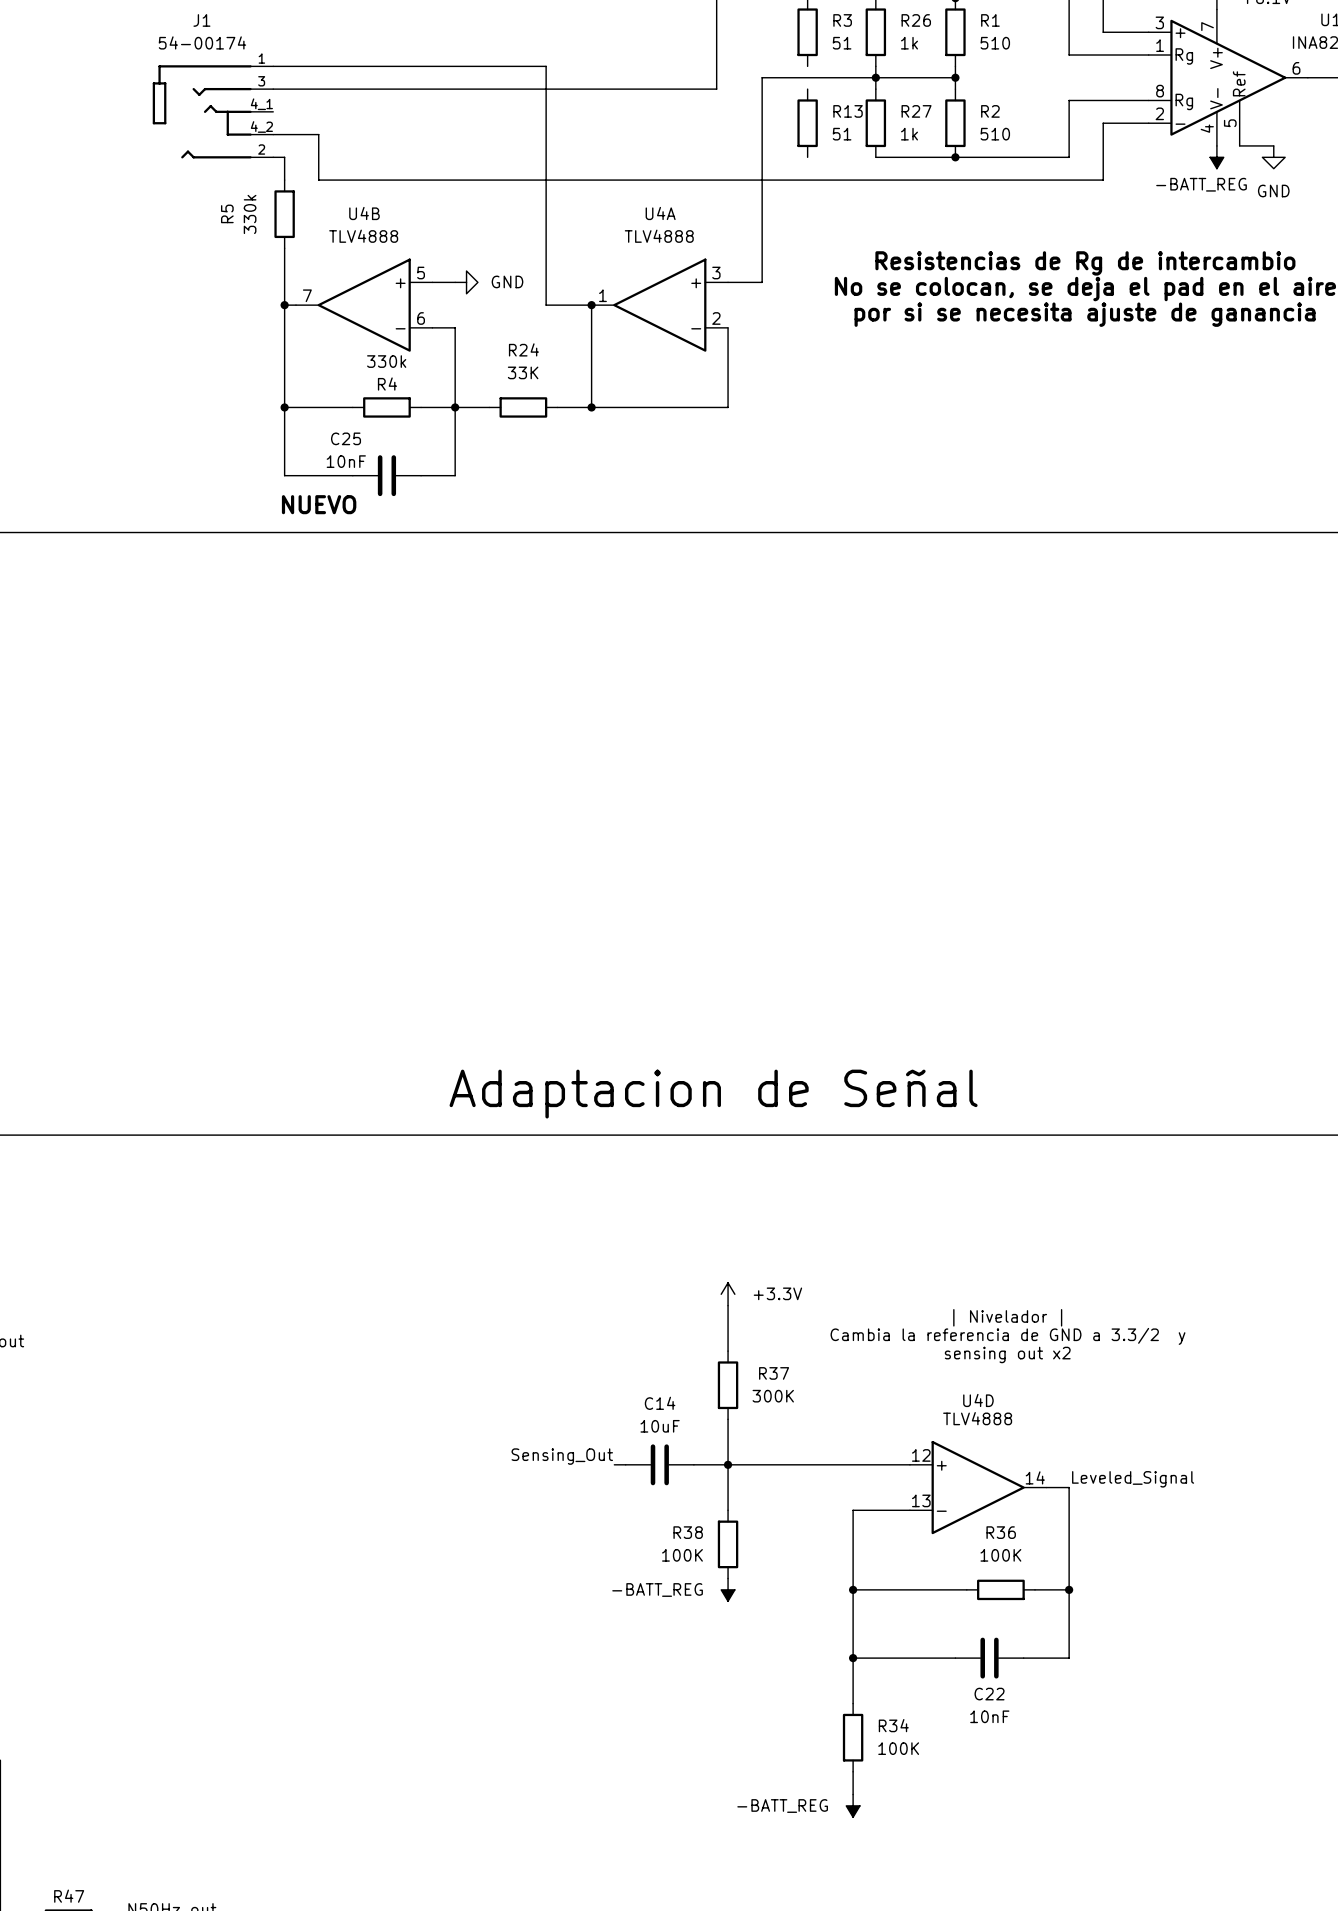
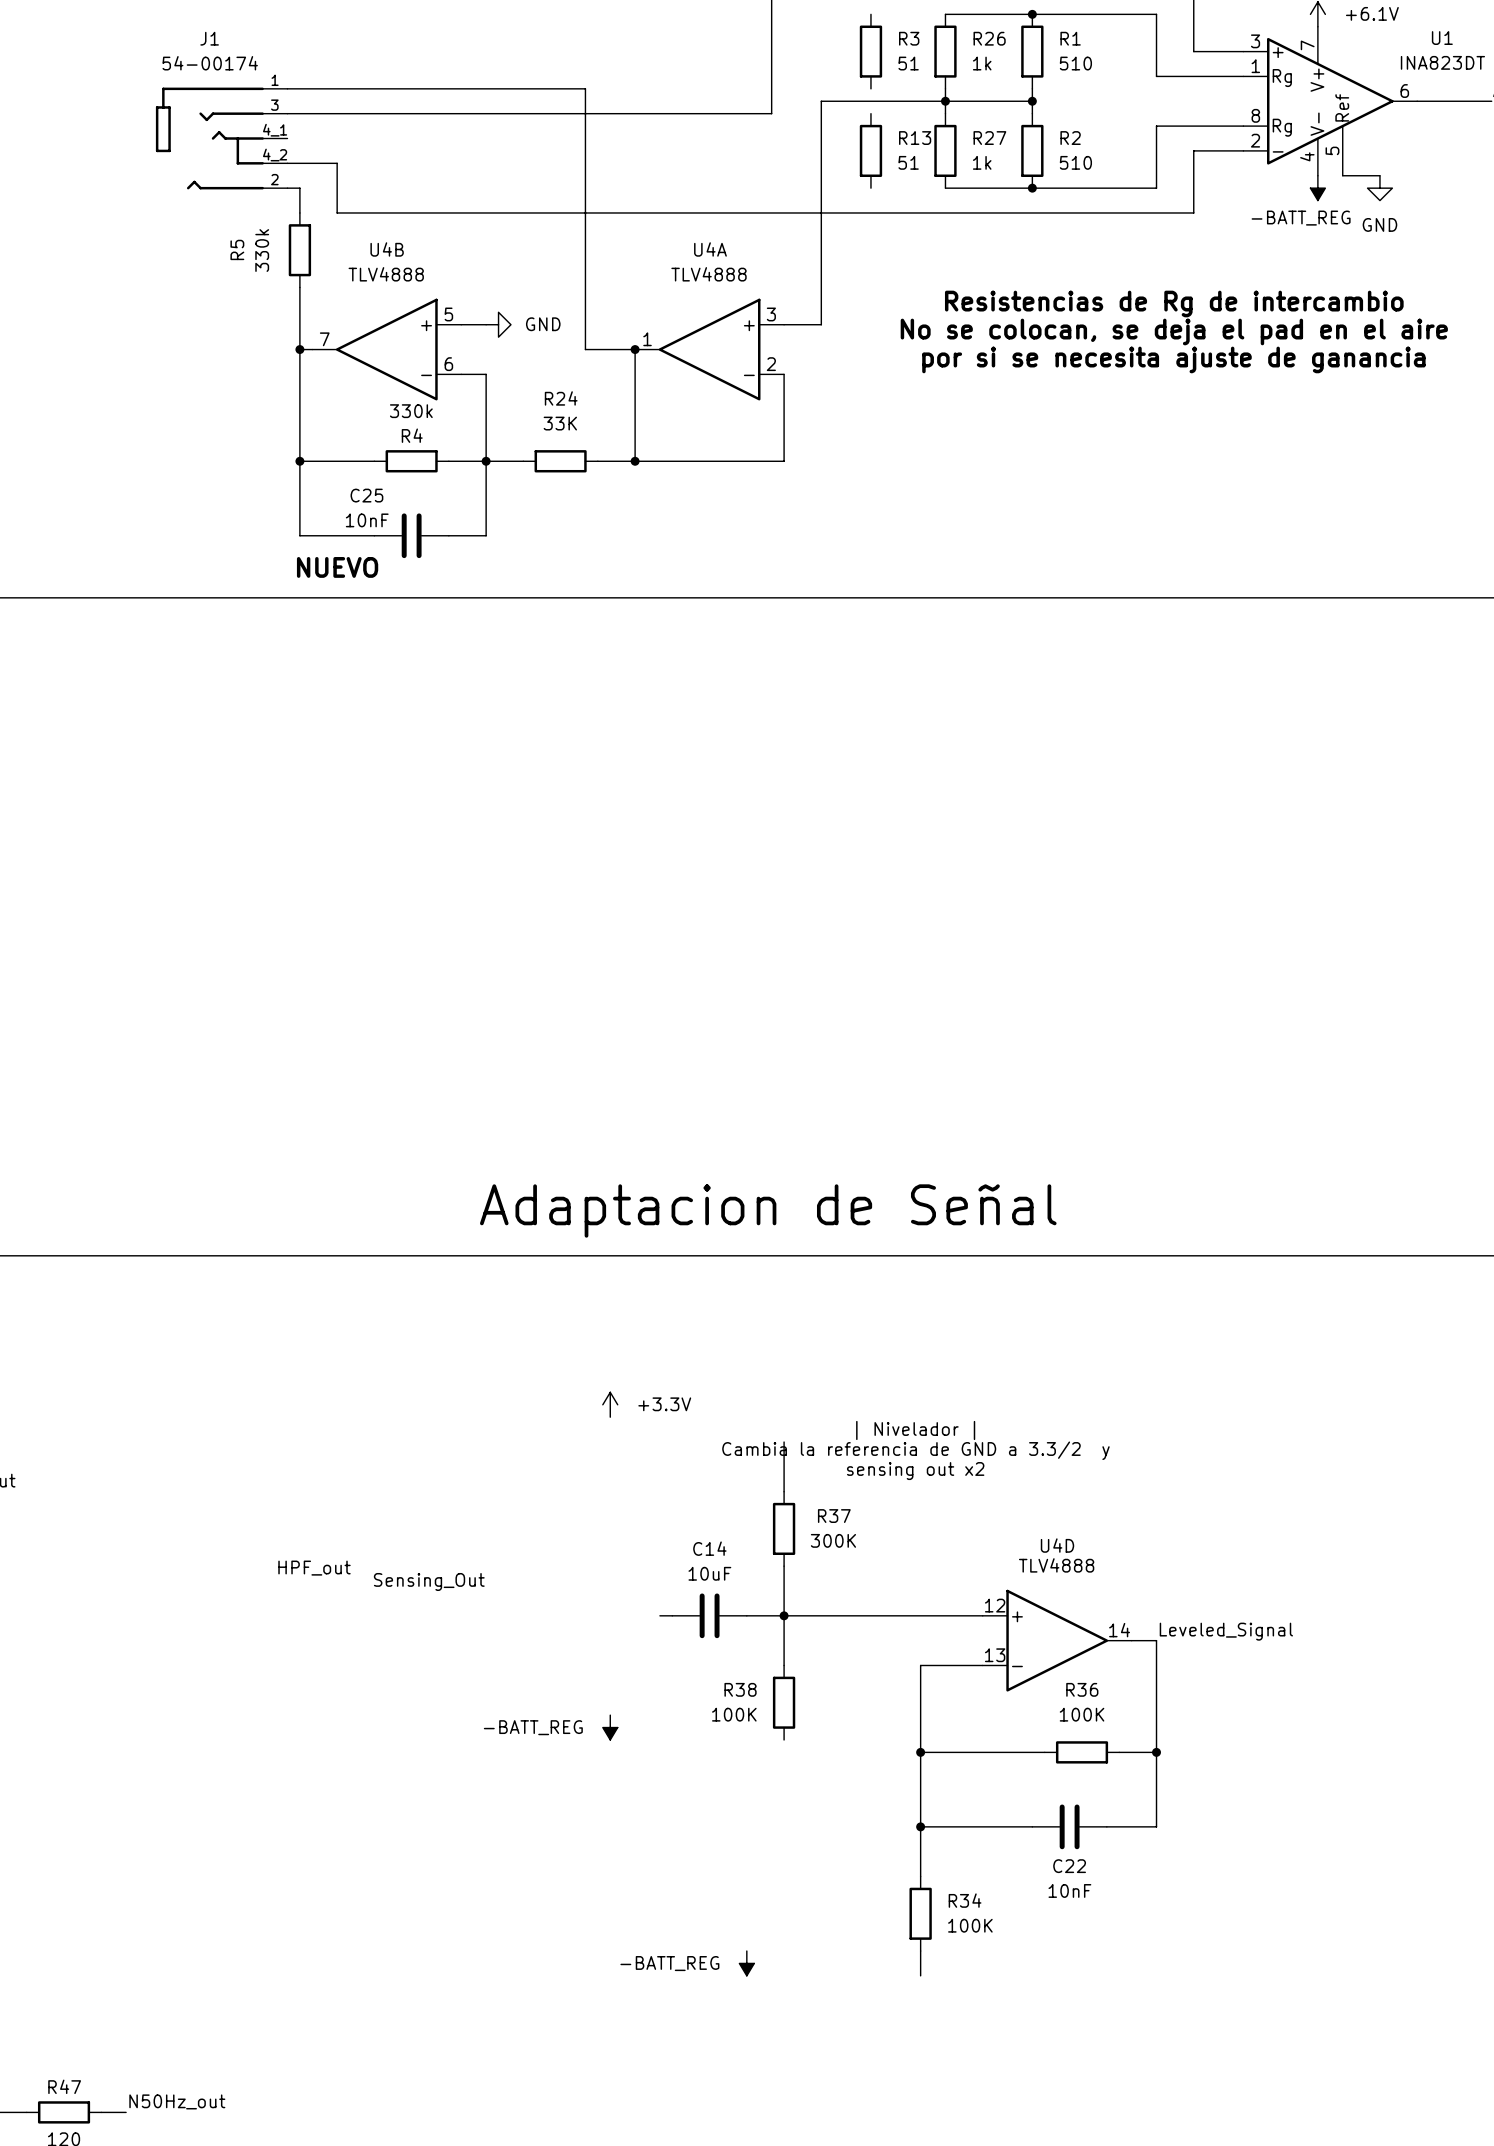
power symbol position: +3.3V (728, 1294) -> +3.3V (610, 1404)
text position: | Nivelador | (1007, 1317) -> | Nivelador | (915, 1430)
text position: Cambia la referencia de GND a 3.3/2 y (1007, 1336) -> Cambia la referencia de GND a 3.3/2 y (915, 1450)
text position: sensing out x2 (1007, 1354) -> sensing out x2 (915, 1471)
label: none -> HPF_out (314, 1568)
label position: Sensing_Out (562, 1456) -> Sensing_Out (429, 1581)
power symbol: none -> -BATT_REG (610, 1727)
power symbol: -BATT_REG (728, 1589) -> none
power symbol: none -> -BATT_REG (746, 1963)
power symbol: -BATT_REG (853, 1805) -> none

